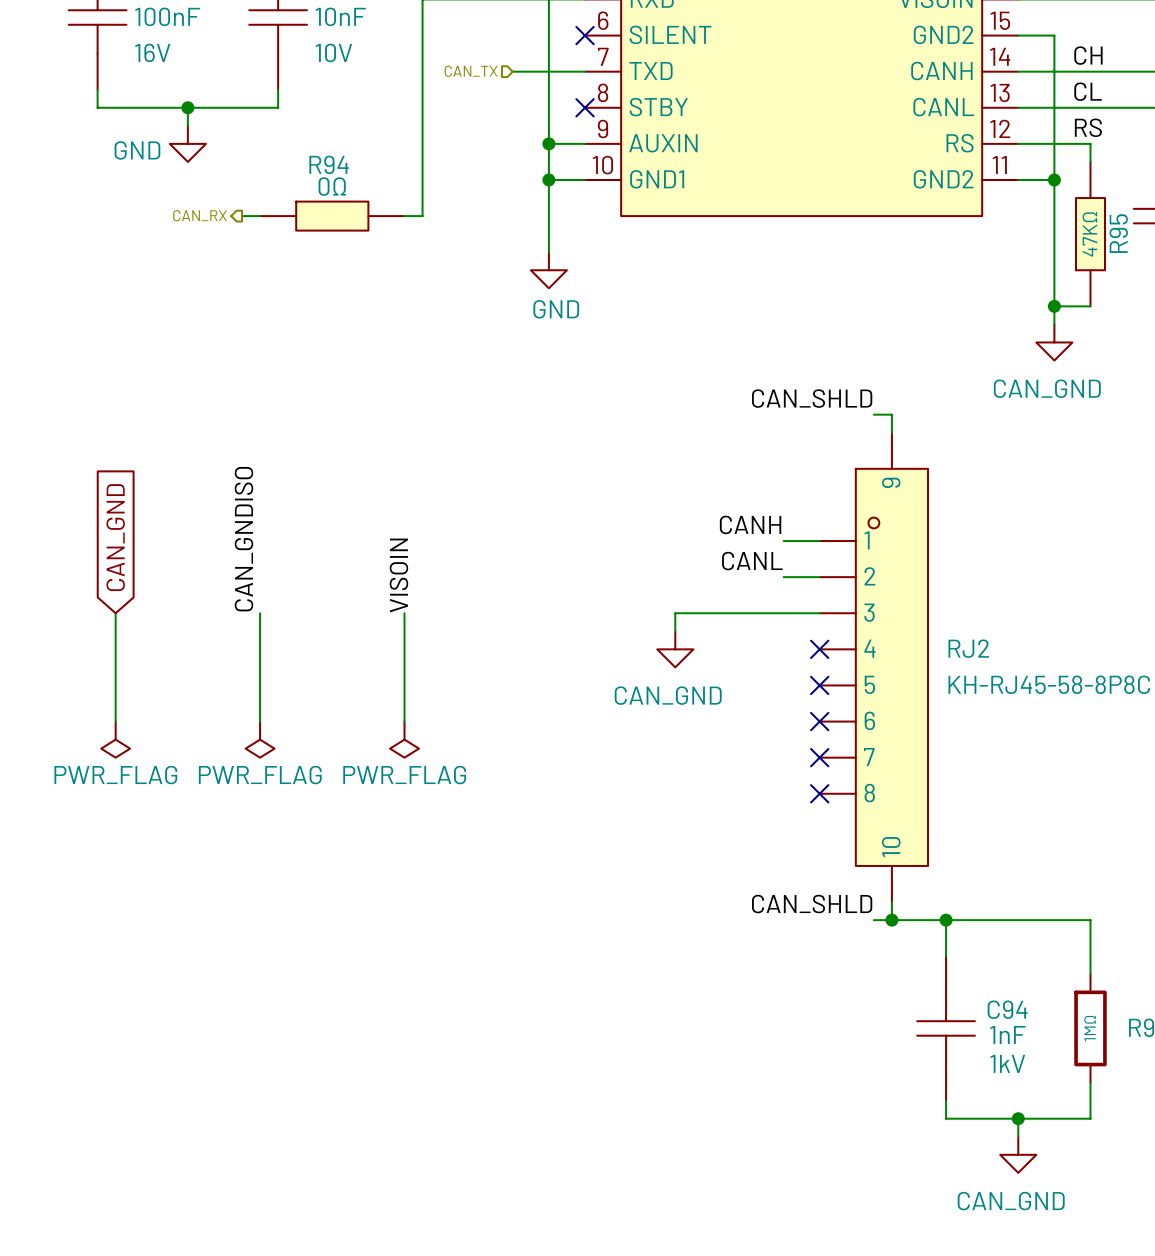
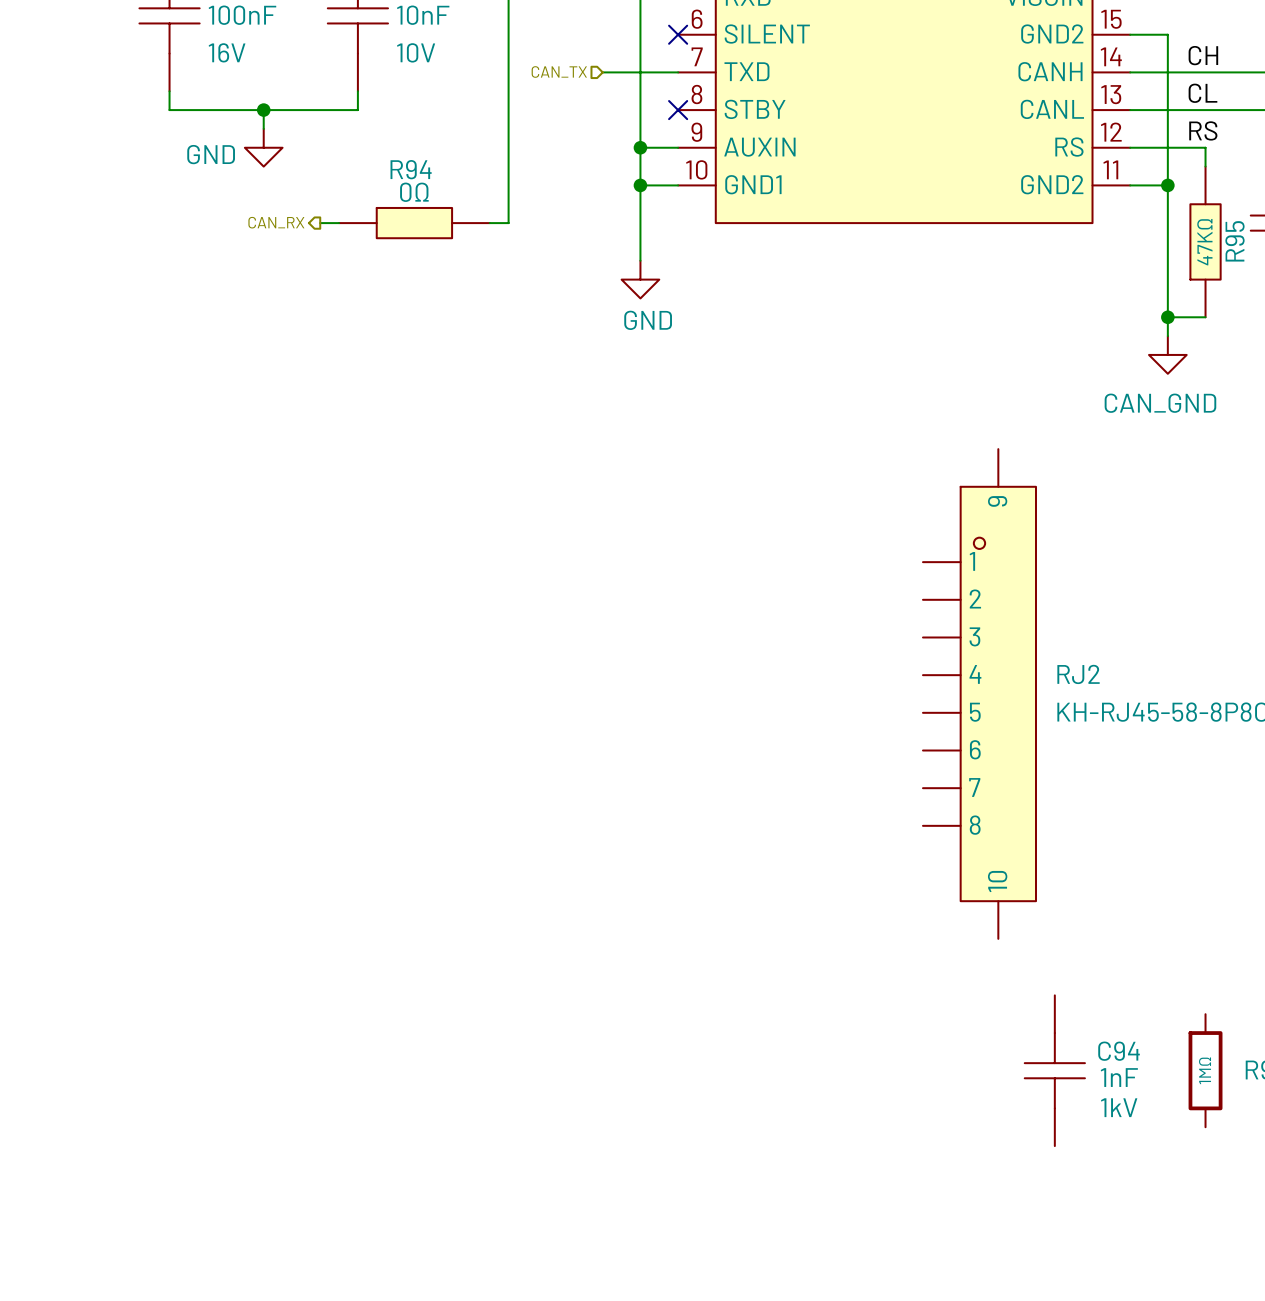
label: CAN_SHLD (812, 398) -> none
wire: (873, 414) (891, 414) (891, 432) -> none
label: CANH (750, 524) -> none
global label: CAN_GND (115, 537) -> none
label: CAN_GNDISO (243, 539) -> none
wire: (783, 541) (819, 541) -> none
label: CANL (752, 561) -> none
label: VISOIN (398, 575) -> none
wire: (783, 577) (819, 577) -> none
wire: (115, 613) (115, 721) -> none
wire: (260, 613) (260, 721) -> none
wire: (404, 613) (404, 721) -> none
wire: (819, 613) (675, 613) (675, 631) -> none
power symbol: CAN_GND (675, 649) -> none
no-connect mark: (819, 649) -> none
no-connect mark: (819, 685) -> none
no-connect mark: (819, 721) -> none
power symbol: PWR_FLAG (115, 739) -> none
power symbol: PWR_FLAG (260, 739) -> none
power symbol: PWR_FLAG (404, 739) -> none
no-connect mark: (819, 757) -> none
no-connect mark: (819, 793) -> none
wire: (891, 902) (891, 920) -> none
label: CAN_SHLD (812, 904) -> none
wire: (873, 920) (1090, 920) (1090, 974) -> none
junction: (891, 920) -> none
wire: (946, 920) (946, 956) -> none
junction: (946, 920) -> none
wire: (1090, 1082) (1090, 1118) (946, 1118) (946, 1100) -> none
wire: (1018, 1118) (1018, 1136) -> none
junction: (1018, 1118) -> none
power symbol: CAN_GND (1018, 1154) -> none

